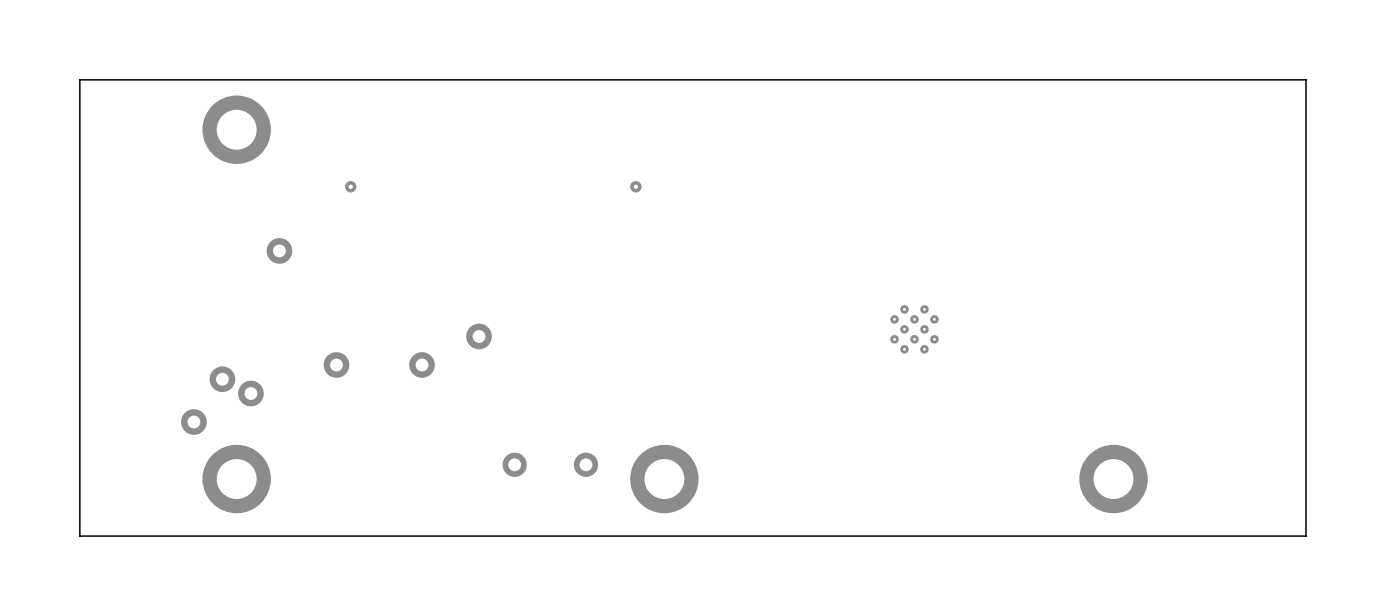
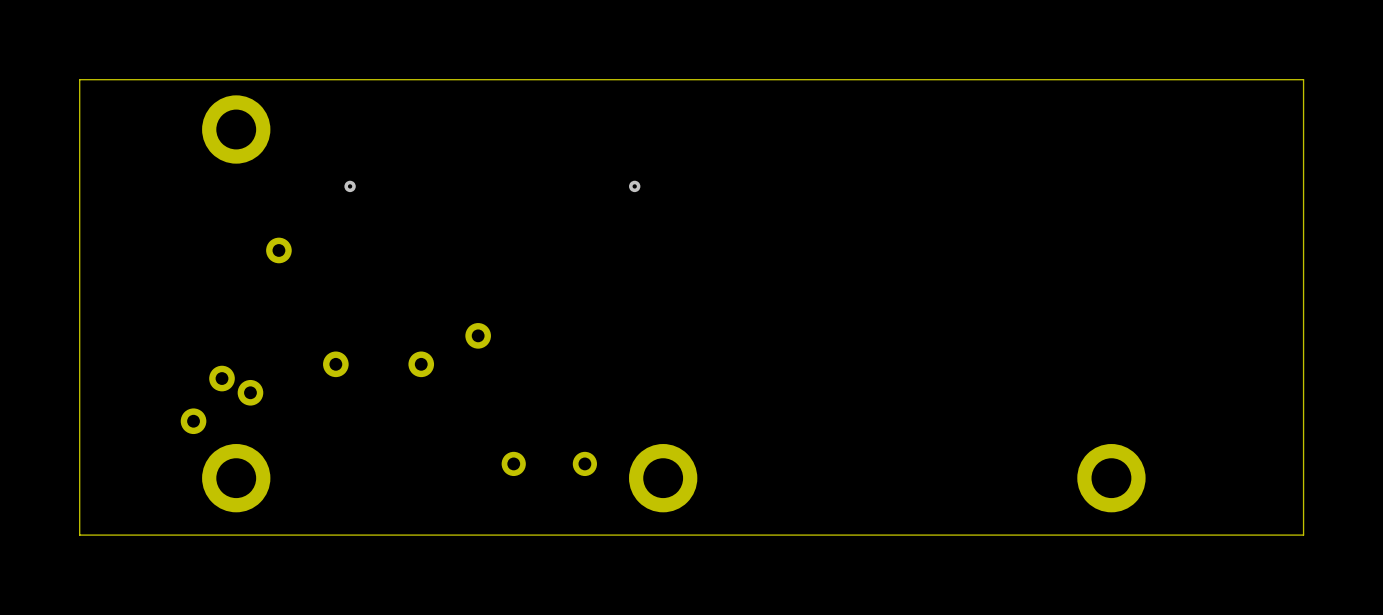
part: (914, 329) -> none

